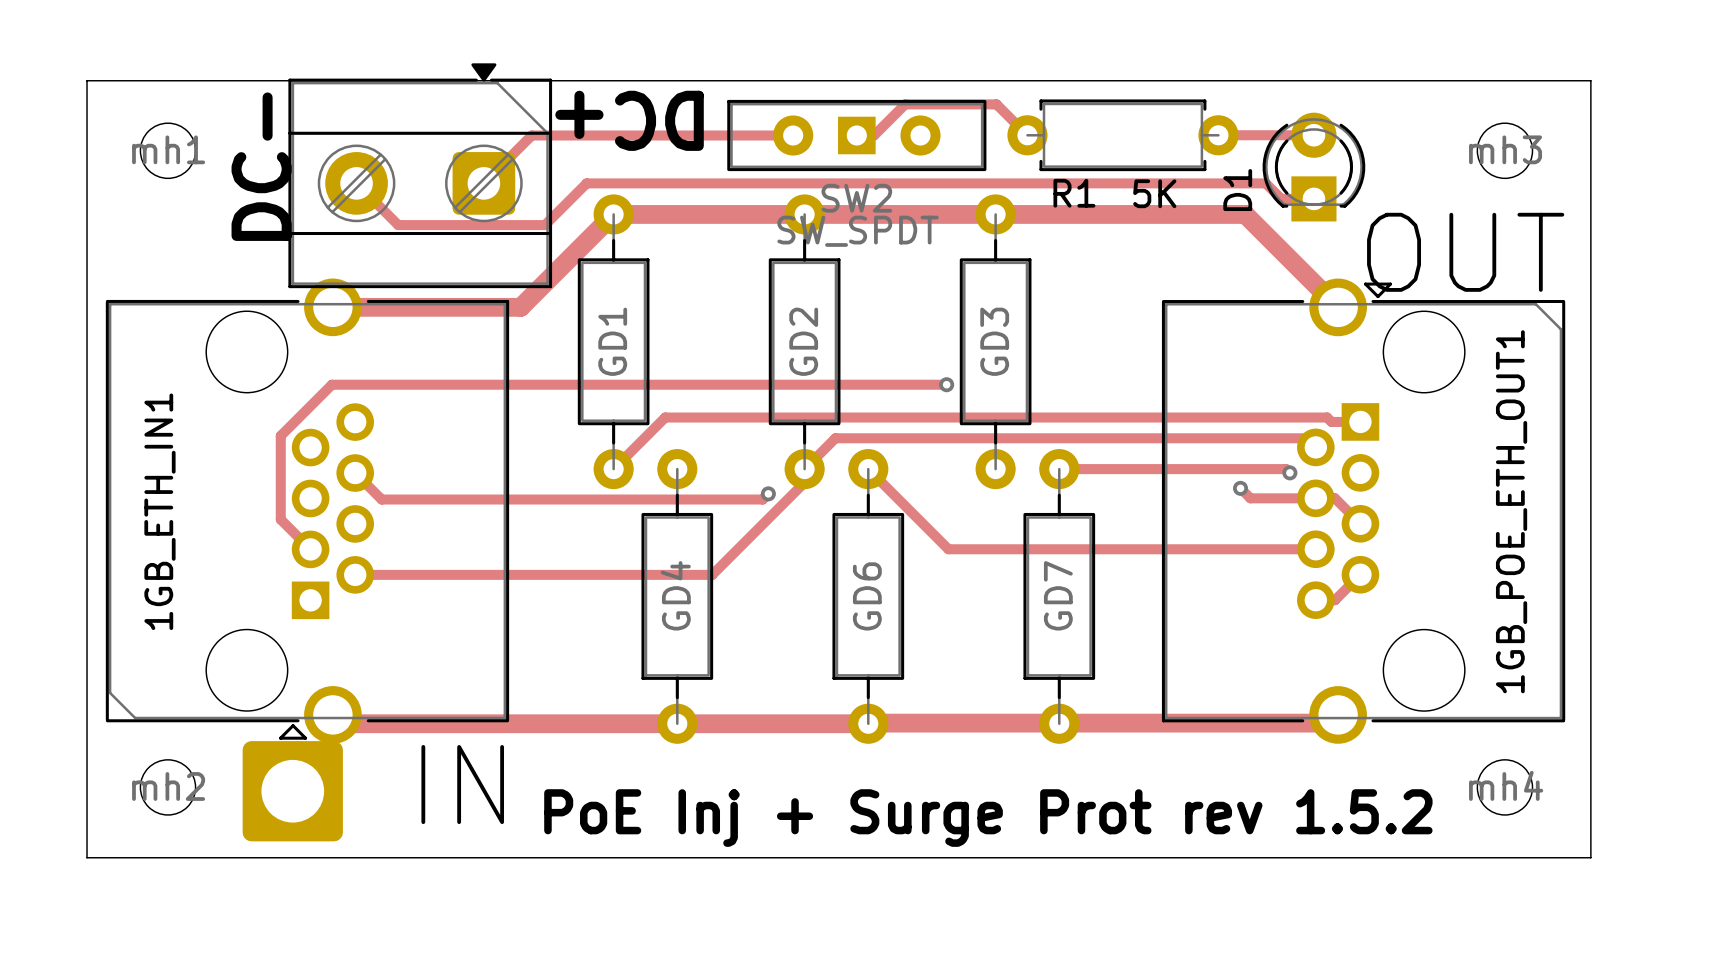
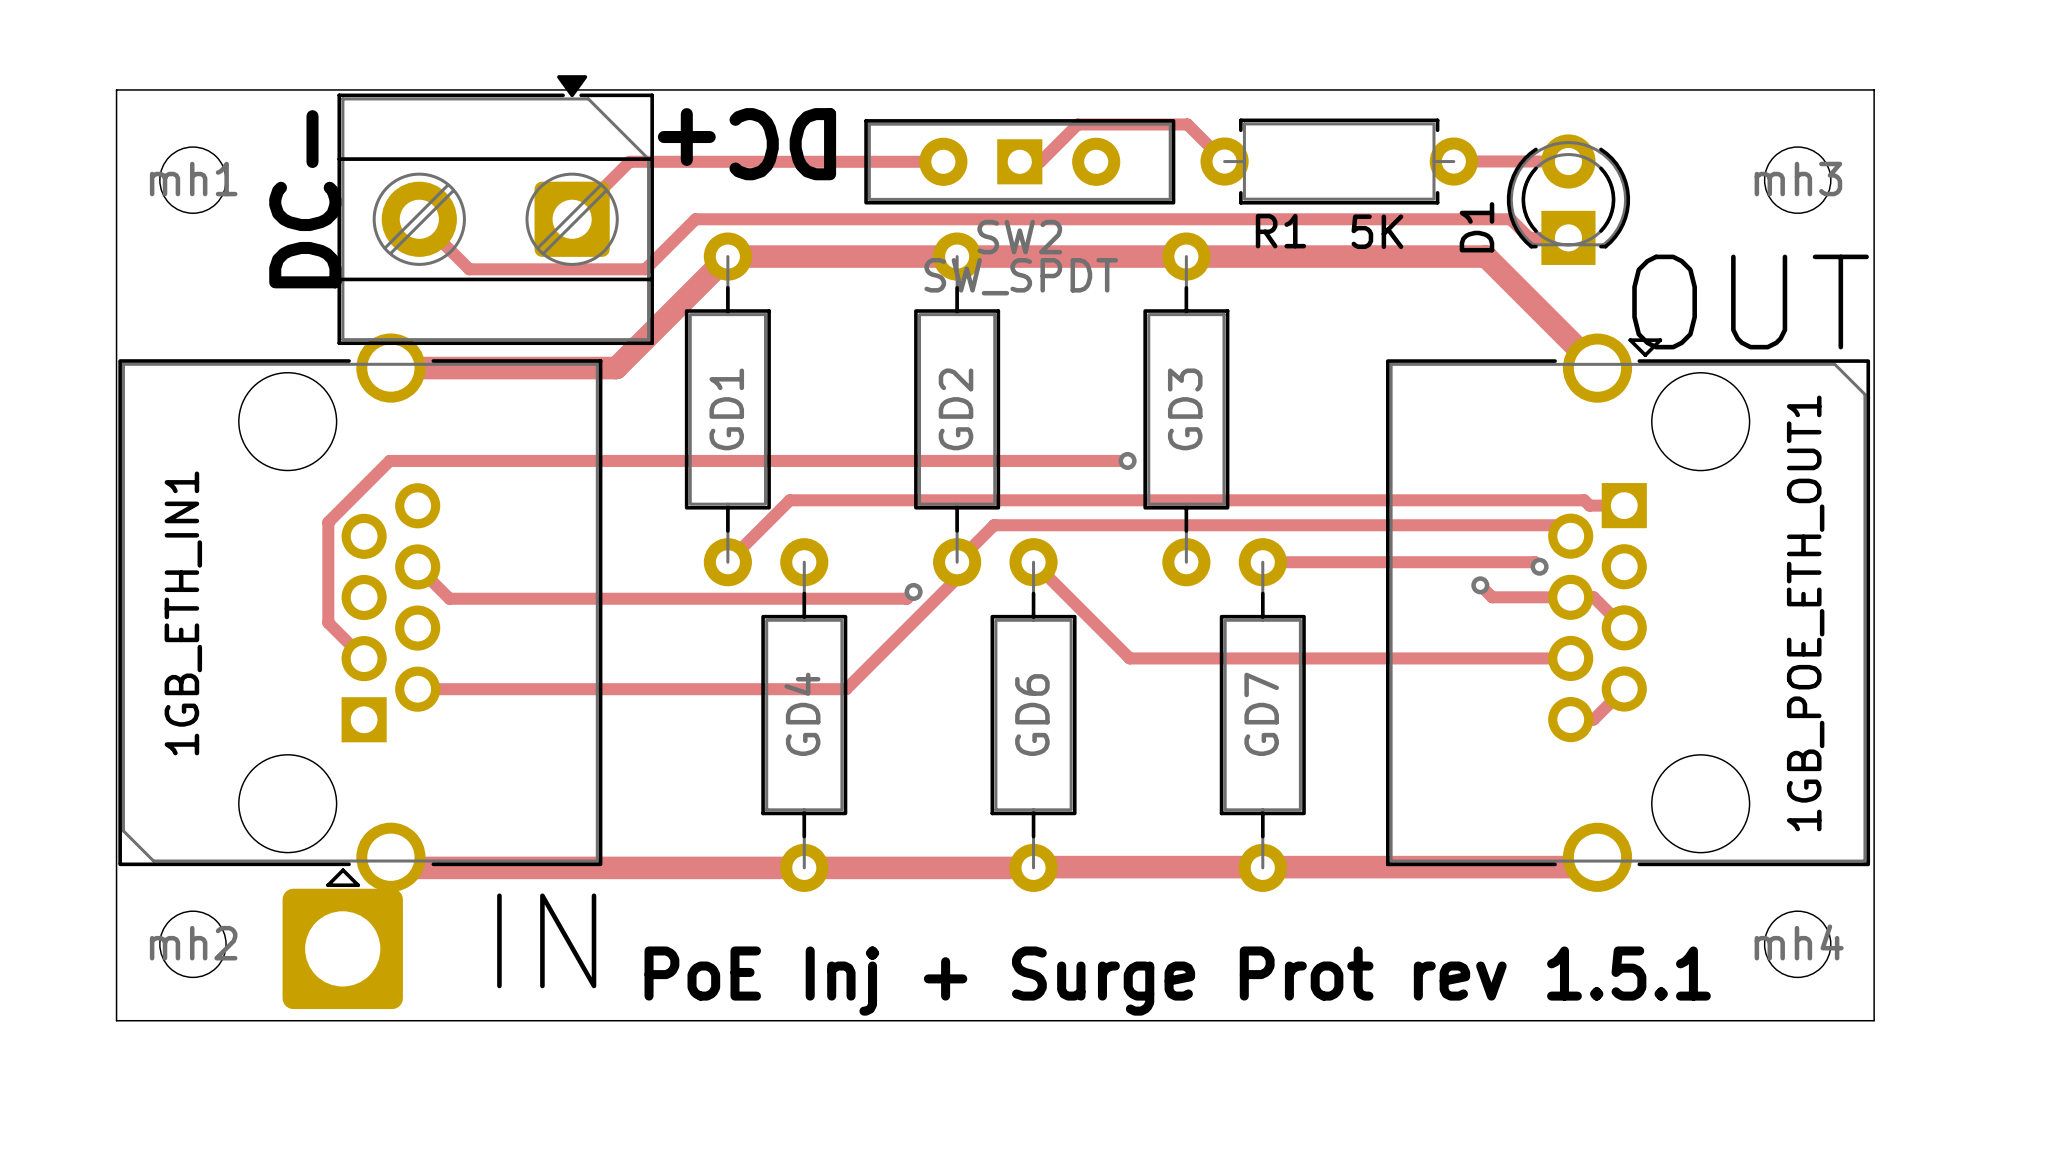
board edge: (87, 80) (1590, 80) (1590, 857) (87, 857) (87, 80) -> (116, 89) (116, 1020) (1874, 1020) (1874, 89) (116, 89)
text: PoE Inj + Surge Prot rev 1.5.2 (988, 818) -> PoE Inj + Surge Prot rev 1.5.1 (1177, 981)

